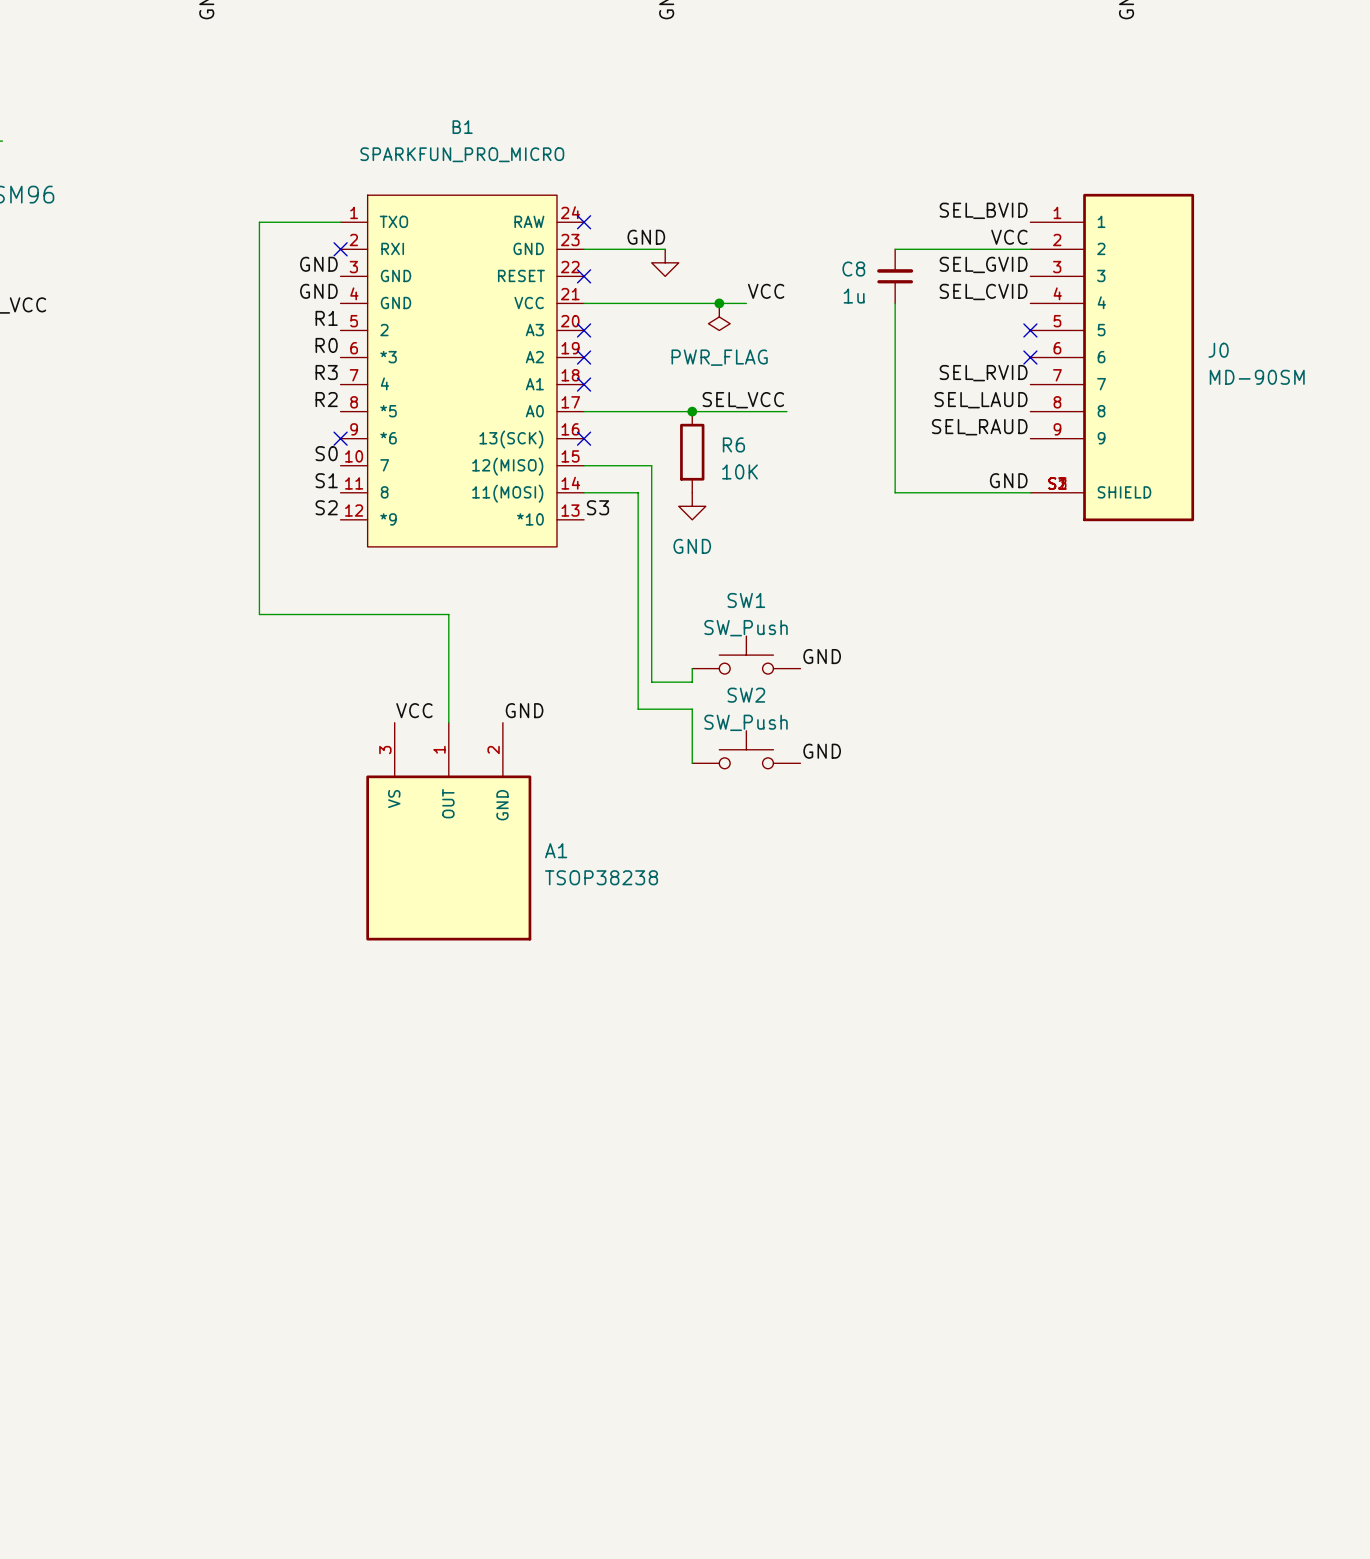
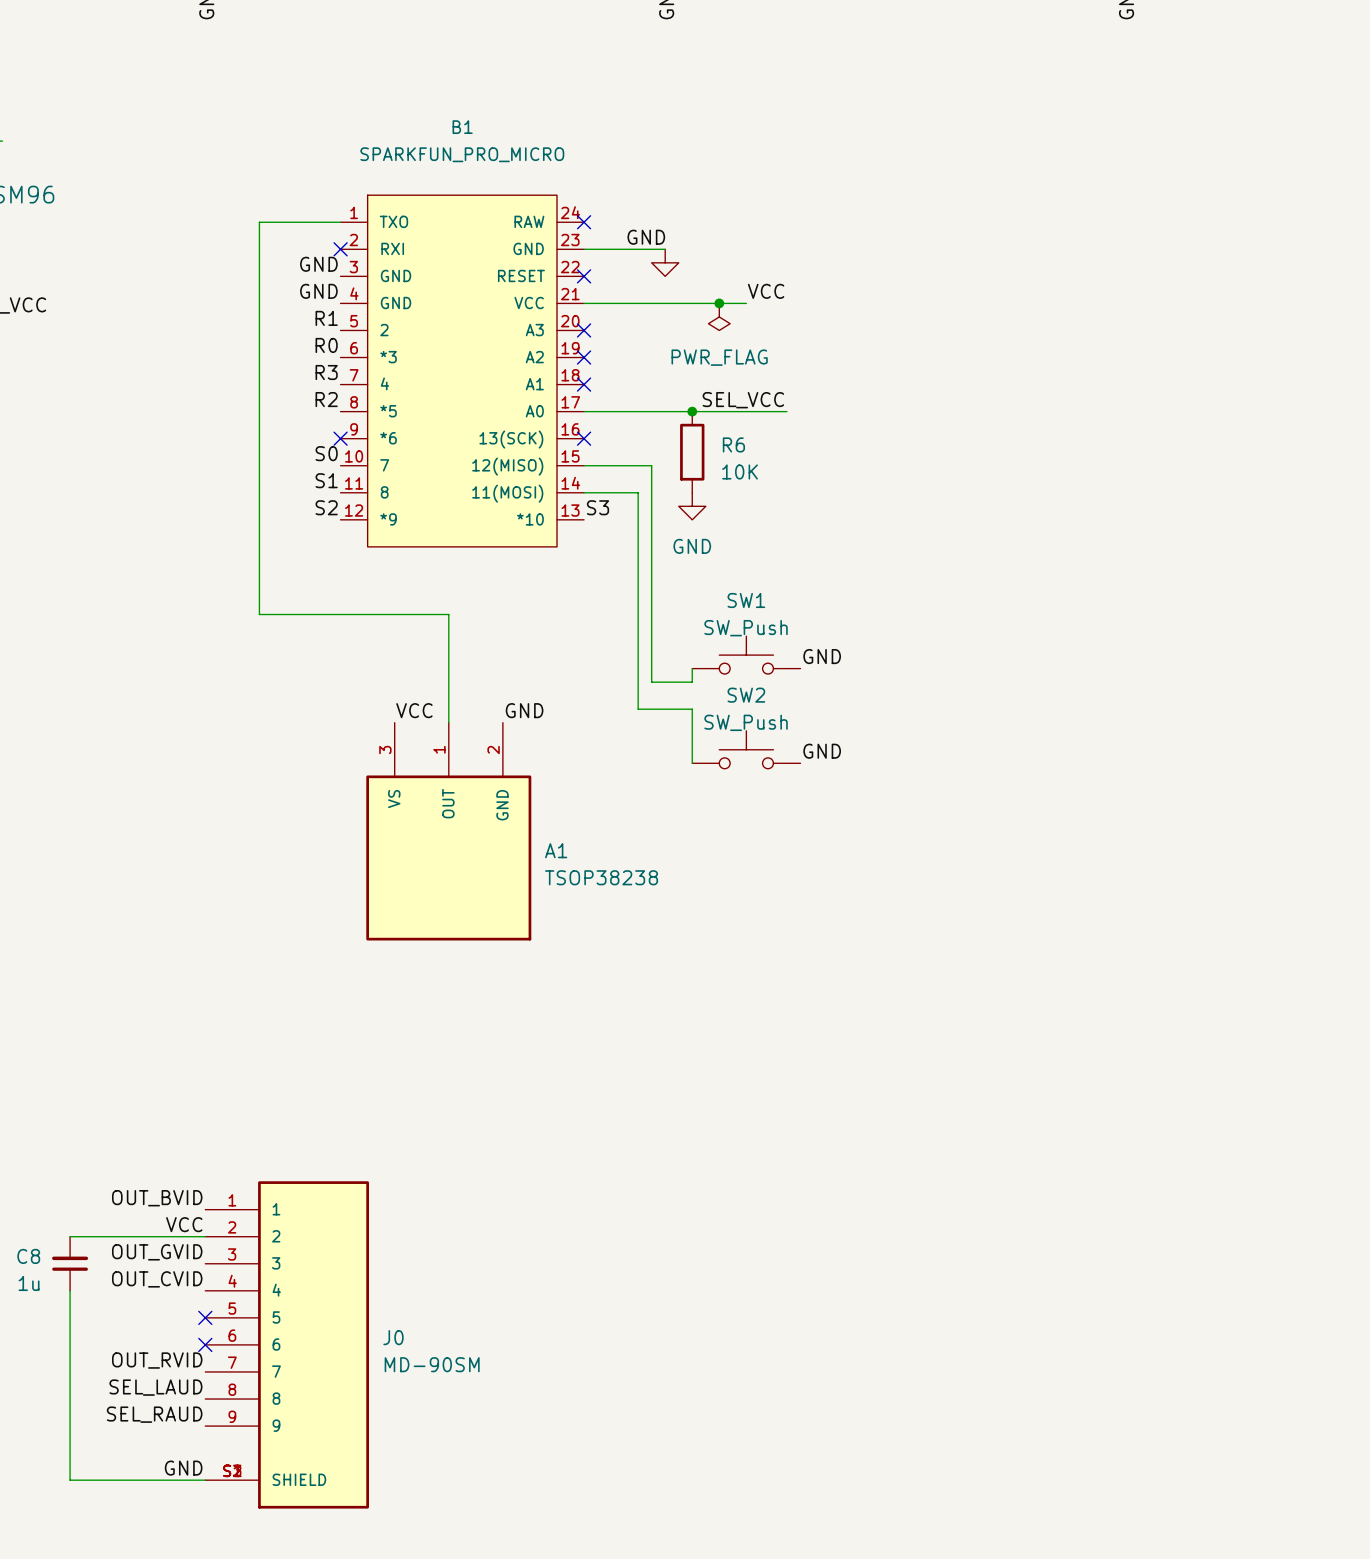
label: SEL_BVID (983, 210) -> none
label: VCC (1009, 237) -> none
wire: (895, 249) (1030, 249) -> none
label: SEL_GVID (983, 264) -> none
C8 position: (895, 276) -> (70, 1263)
label: SEL_CVID (983, 291) -> none
wire: (895, 303) (895, 492) (1030, 492) -> none
no-connect mark: (1030, 330) -> none
no-connect mark: (1030, 357) -> none
J0 position: (1112, 357) -> (287, 1344)
label: SEL_RVID (983, 373) -> none
label: SEL_LAUD (981, 400) -> none
label: SEL_RAUD (979, 427) -> none
label: GND (1008, 480) -> none
label: none -> OUT_BVID (157, 1198)
label: none -> VCC (184, 1224)
wire: none -> (70, 1236) (205, 1236)
label: none -> OUT_GVID (157, 1252)
label: none -> OUT_CVID (157, 1279)
wire: none -> (70, 1290) (70, 1480) (205, 1480)
no-connect mark: none -> (205, 1317)
no-connect mark: none -> (205, 1344)
label: none -> OUT_RVID (157, 1360)
label: none -> SEL_LAUD (155, 1387)
label: none -> SEL_RAUD (154, 1414)
label: none -> GND (183, 1468)

